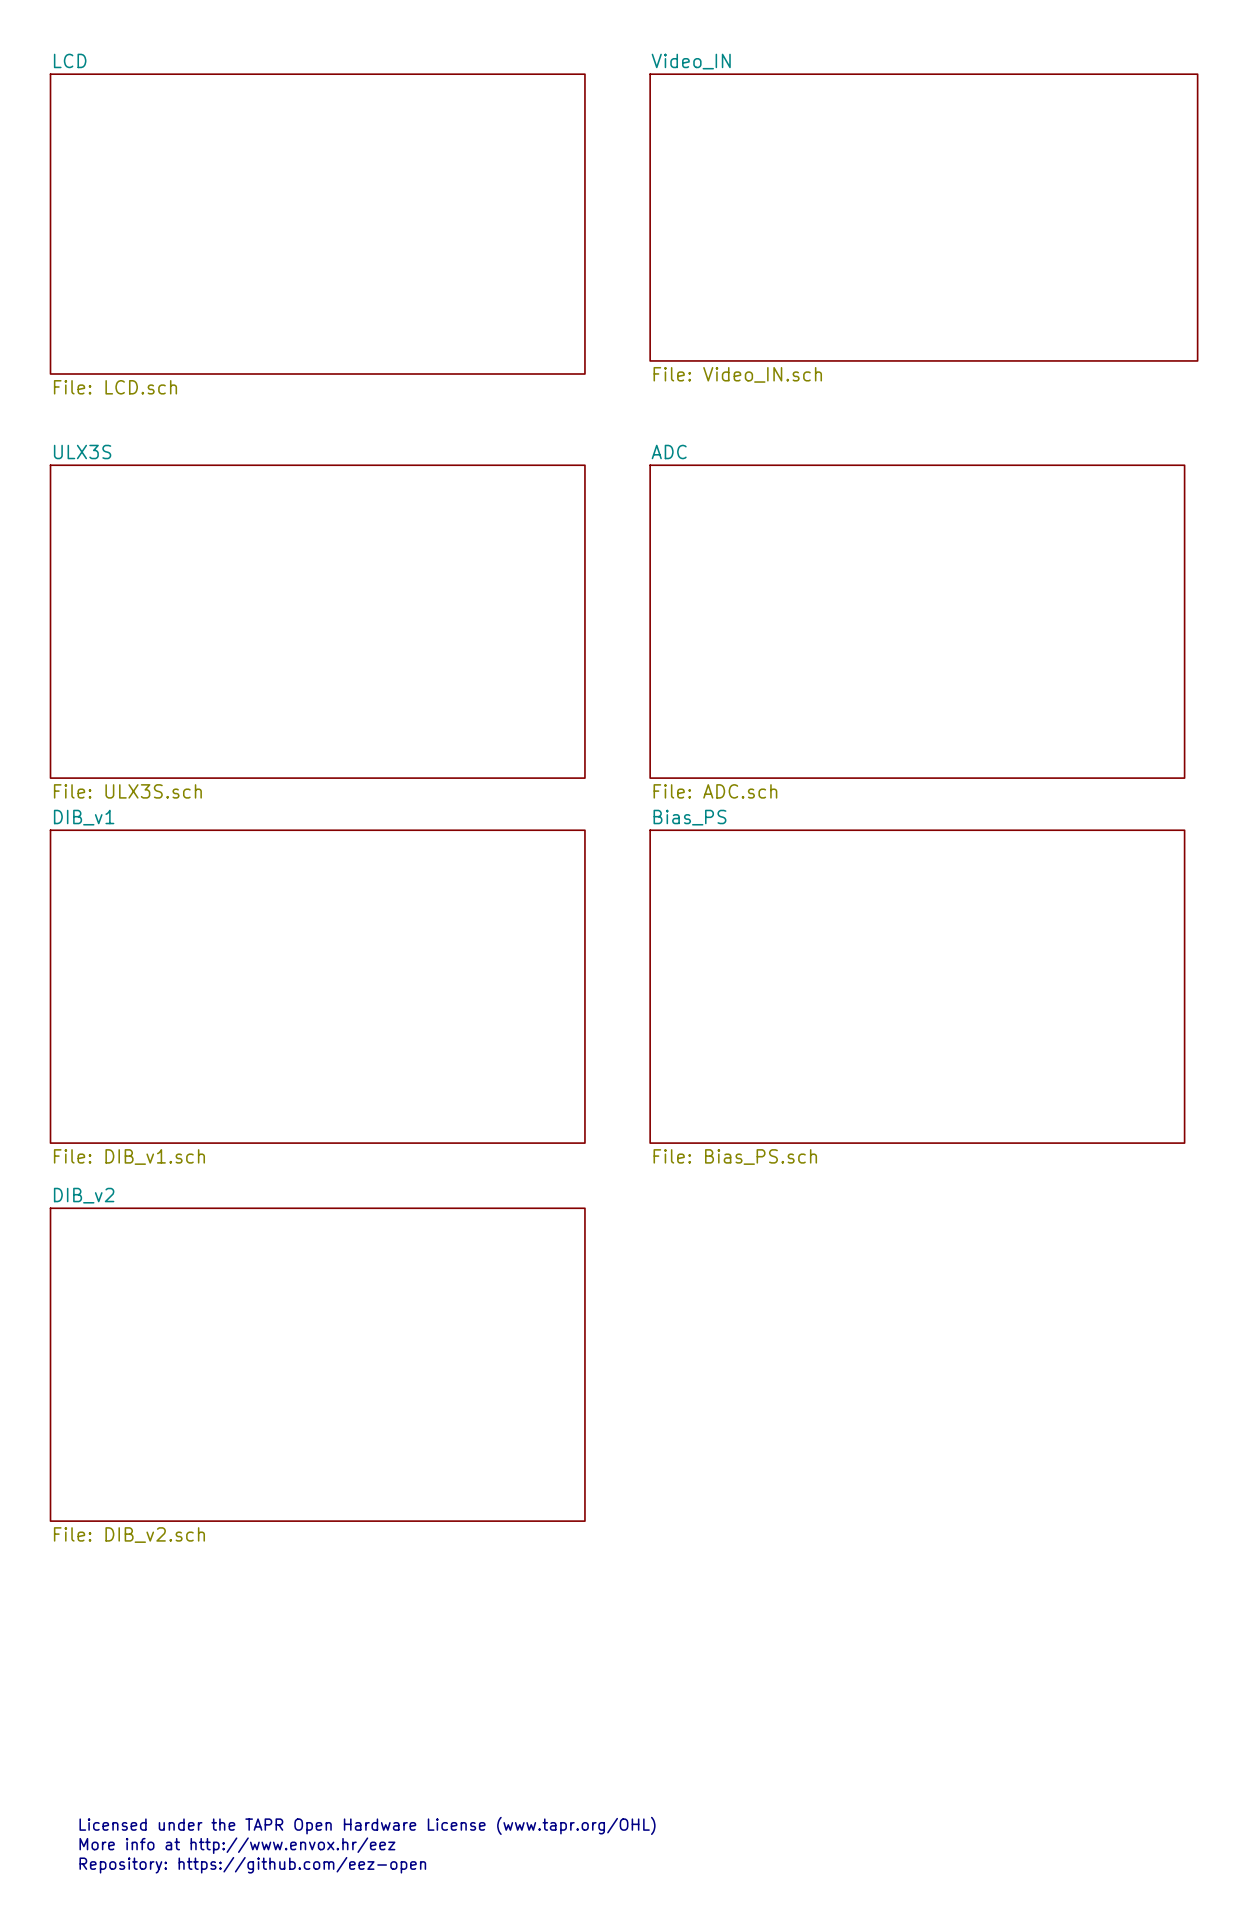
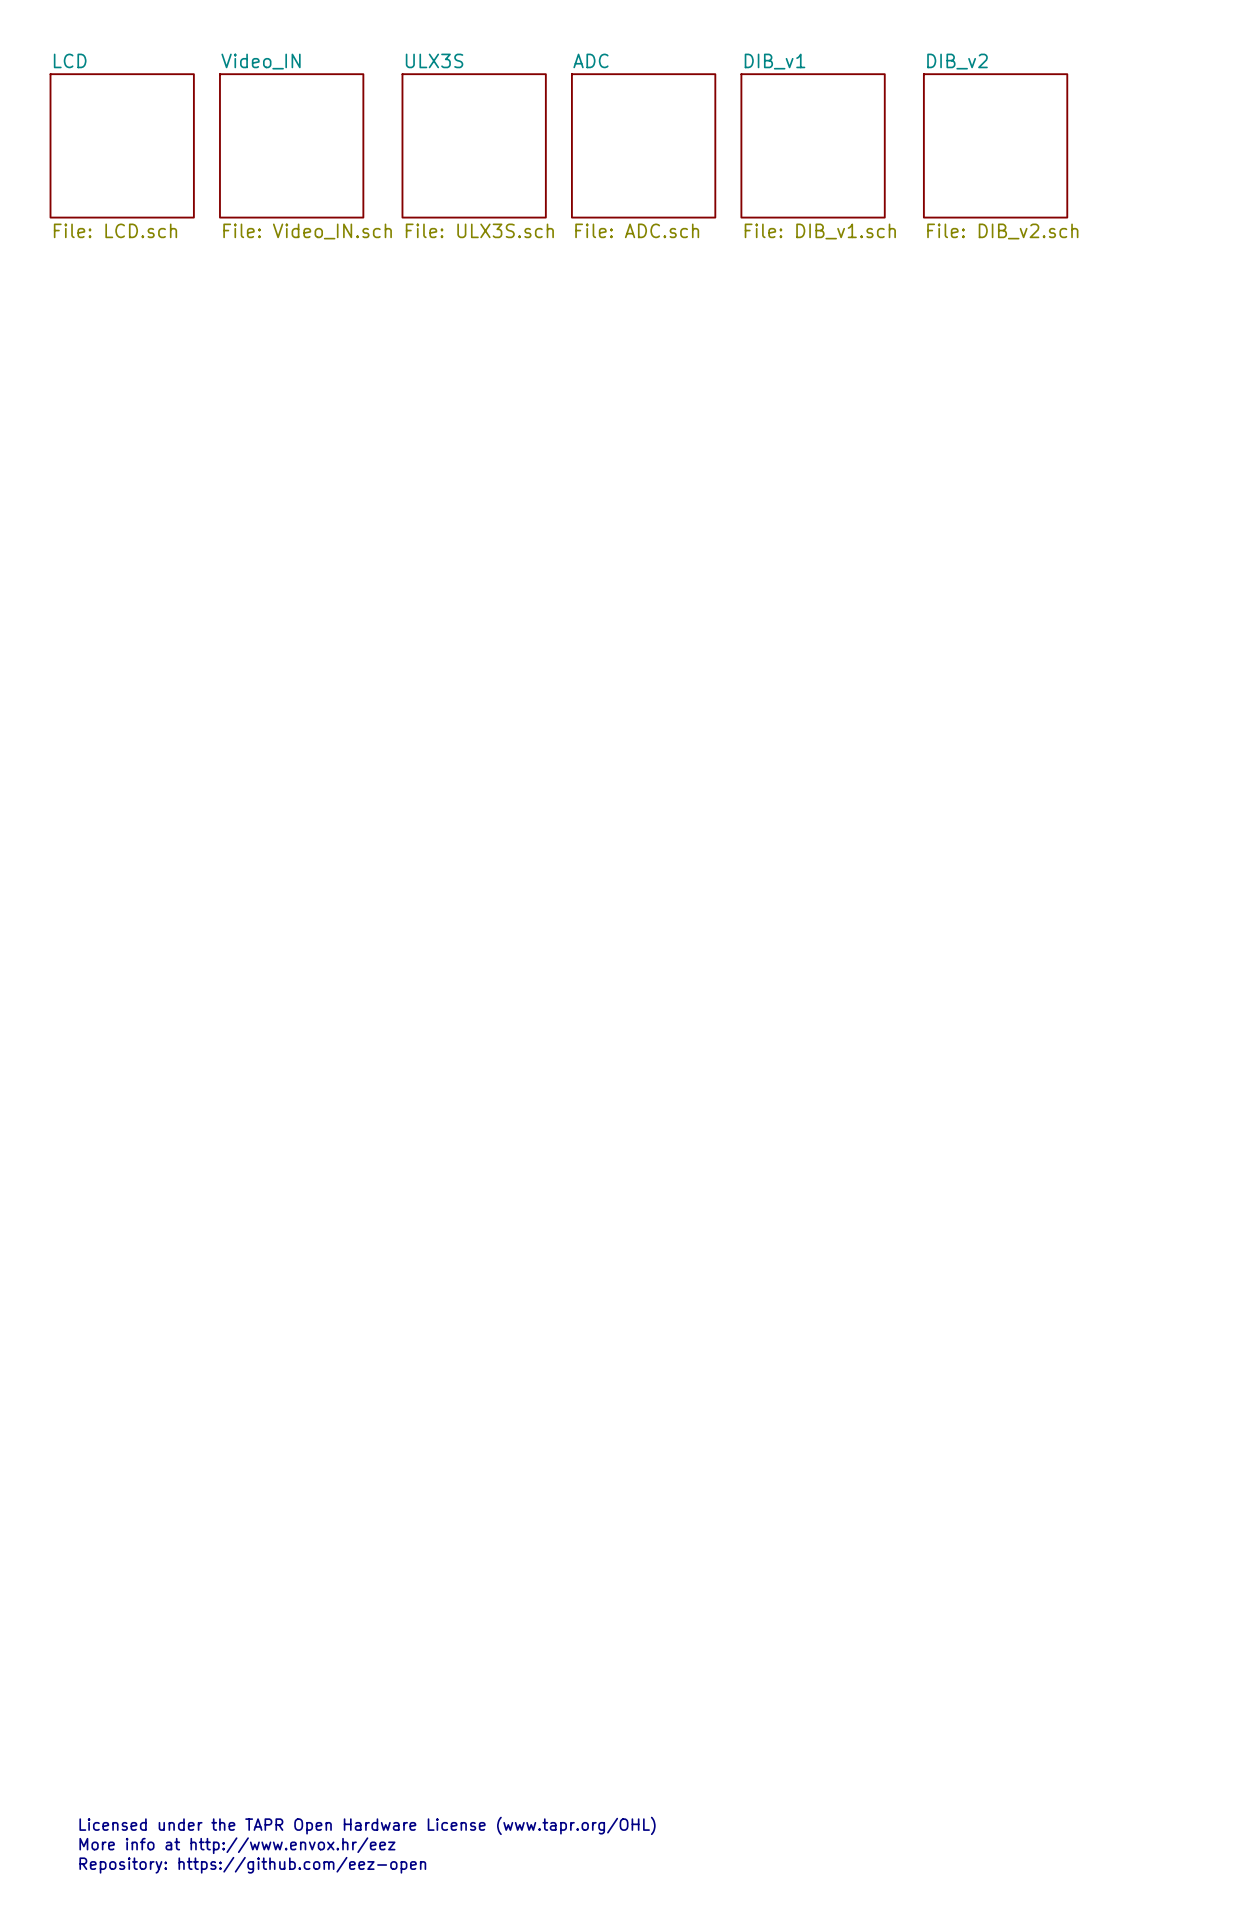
sheet LCD: none -> File: LCD.sch (122, 145)
sheet Video_IN: none -> File: Video_IN.sch (291, 145)
sheet ADC: none -> File: ADC.sch (643, 145)
sheet Video_IN: File: Video_IN.sch (923, 217) -> none
sheet LCD: File: LCD.sch (317, 224) -> none
sheet ULX3S name position: ULX3S (82, 452) -> ULX3S (434, 60)
sheet ULX3S shape: [50, 465, 585, 779] -> [402, 74, 546, 218]
sheet ADC: File: ADC.sch (917, 621) -> none
sheet ULX3S value position: File: ULX3S.sch (127, 791) -> File: ULX3S.sch (479, 230)
sheet DIB_v1 name position: DIB_v1 (84, 817) -> DIB_v1 (775, 61)
sheet DIB_v1 shape: [50, 830, 585, 1144] -> [741, 74, 885, 218]
sheet Bias_PS: File: Bias_PS.sch (917, 986) -> none
sheet DIB_v1 value position: File: DIB_v1.sch (129, 1157) -> File: DIB_v1.sch (820, 231)
sheet DIB_v2 name position: DIB_v2 (84, 1195) -> DIB_v2 (957, 61)
sheet DIB_v2 shape: [50, 1208, 585, 1522] -> [923, 74, 1068, 218]
sheet DIB_v2 value position: File: DIB_v2.sch (129, 1535) -> File: DIB_v2.sch (1002, 231)

